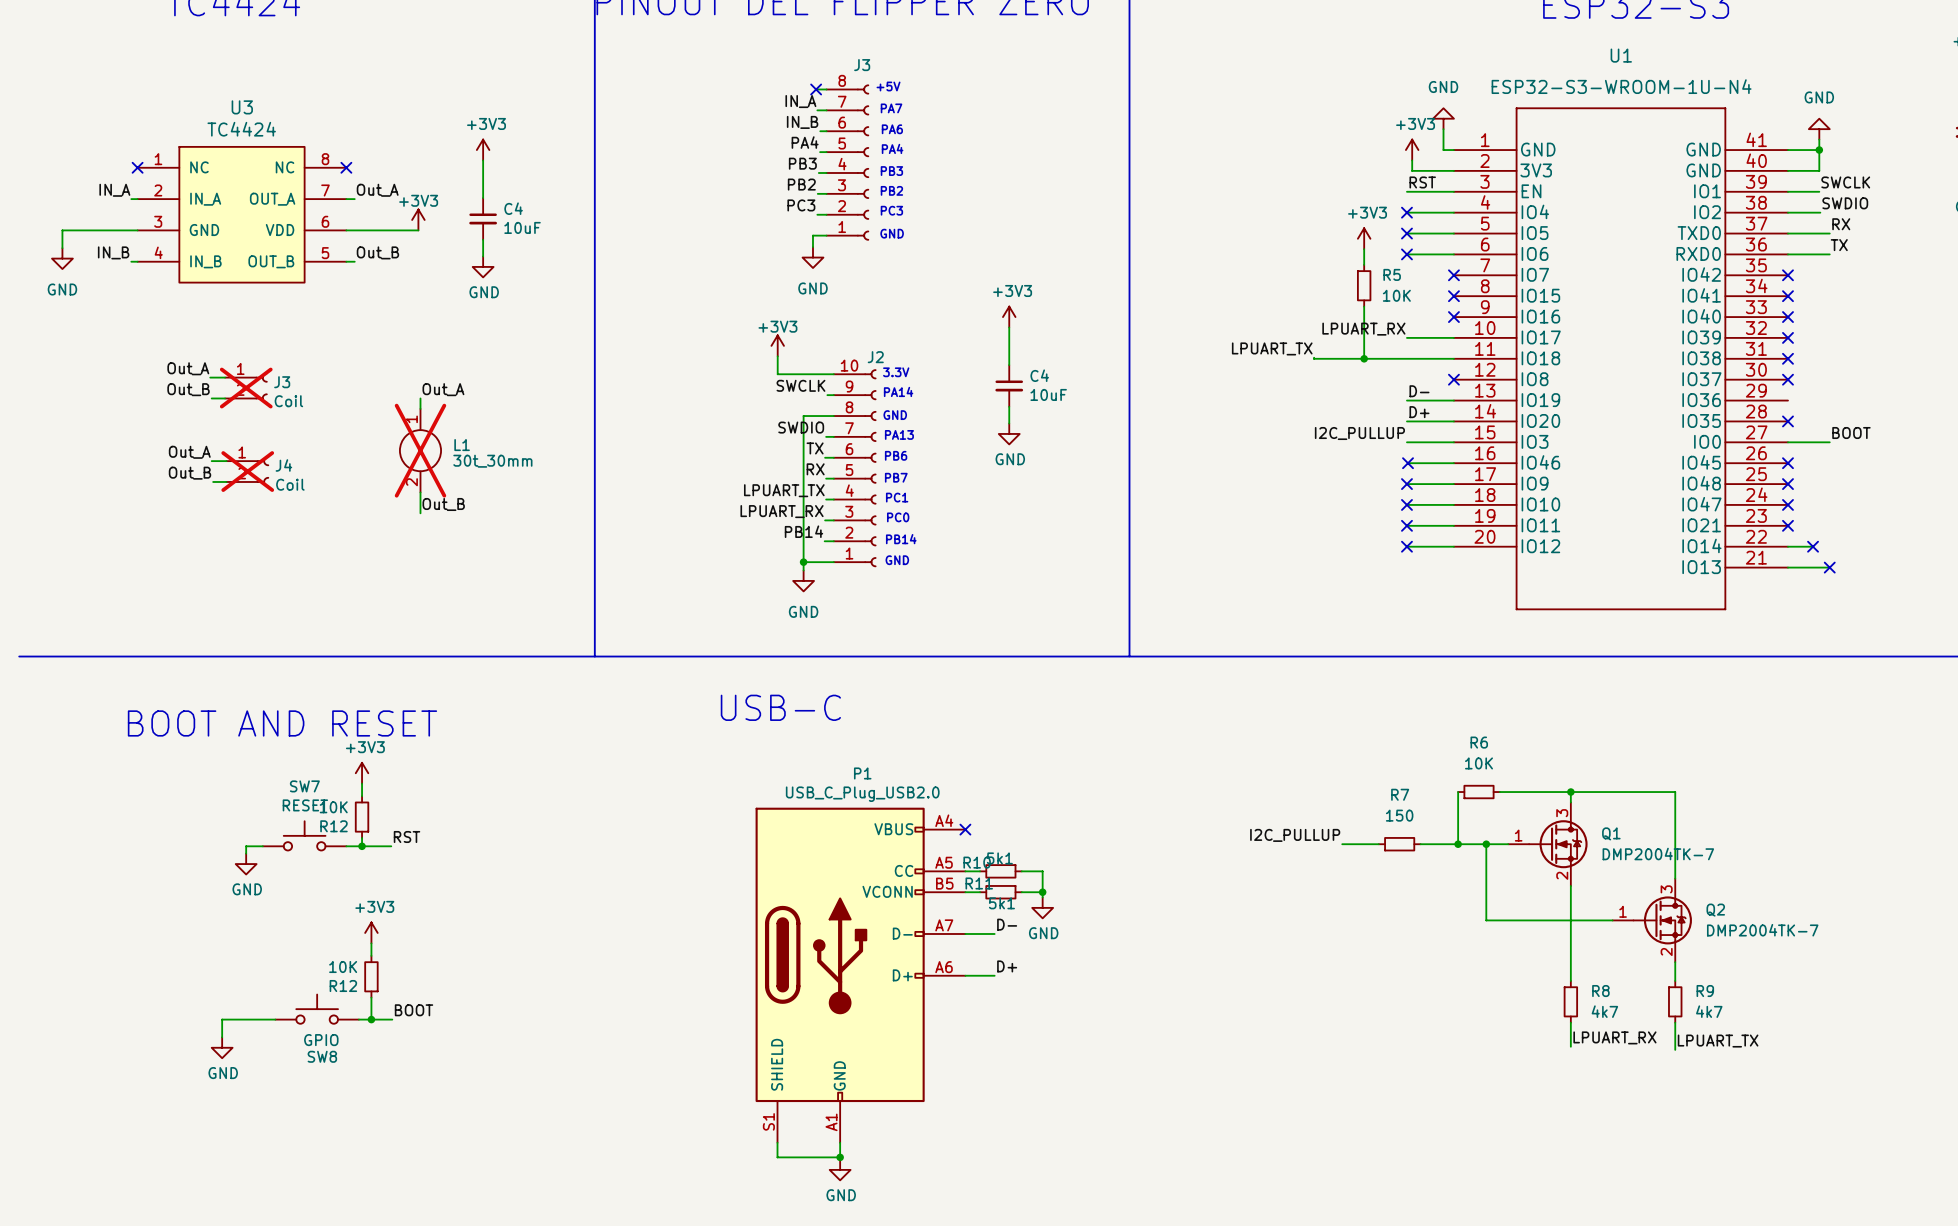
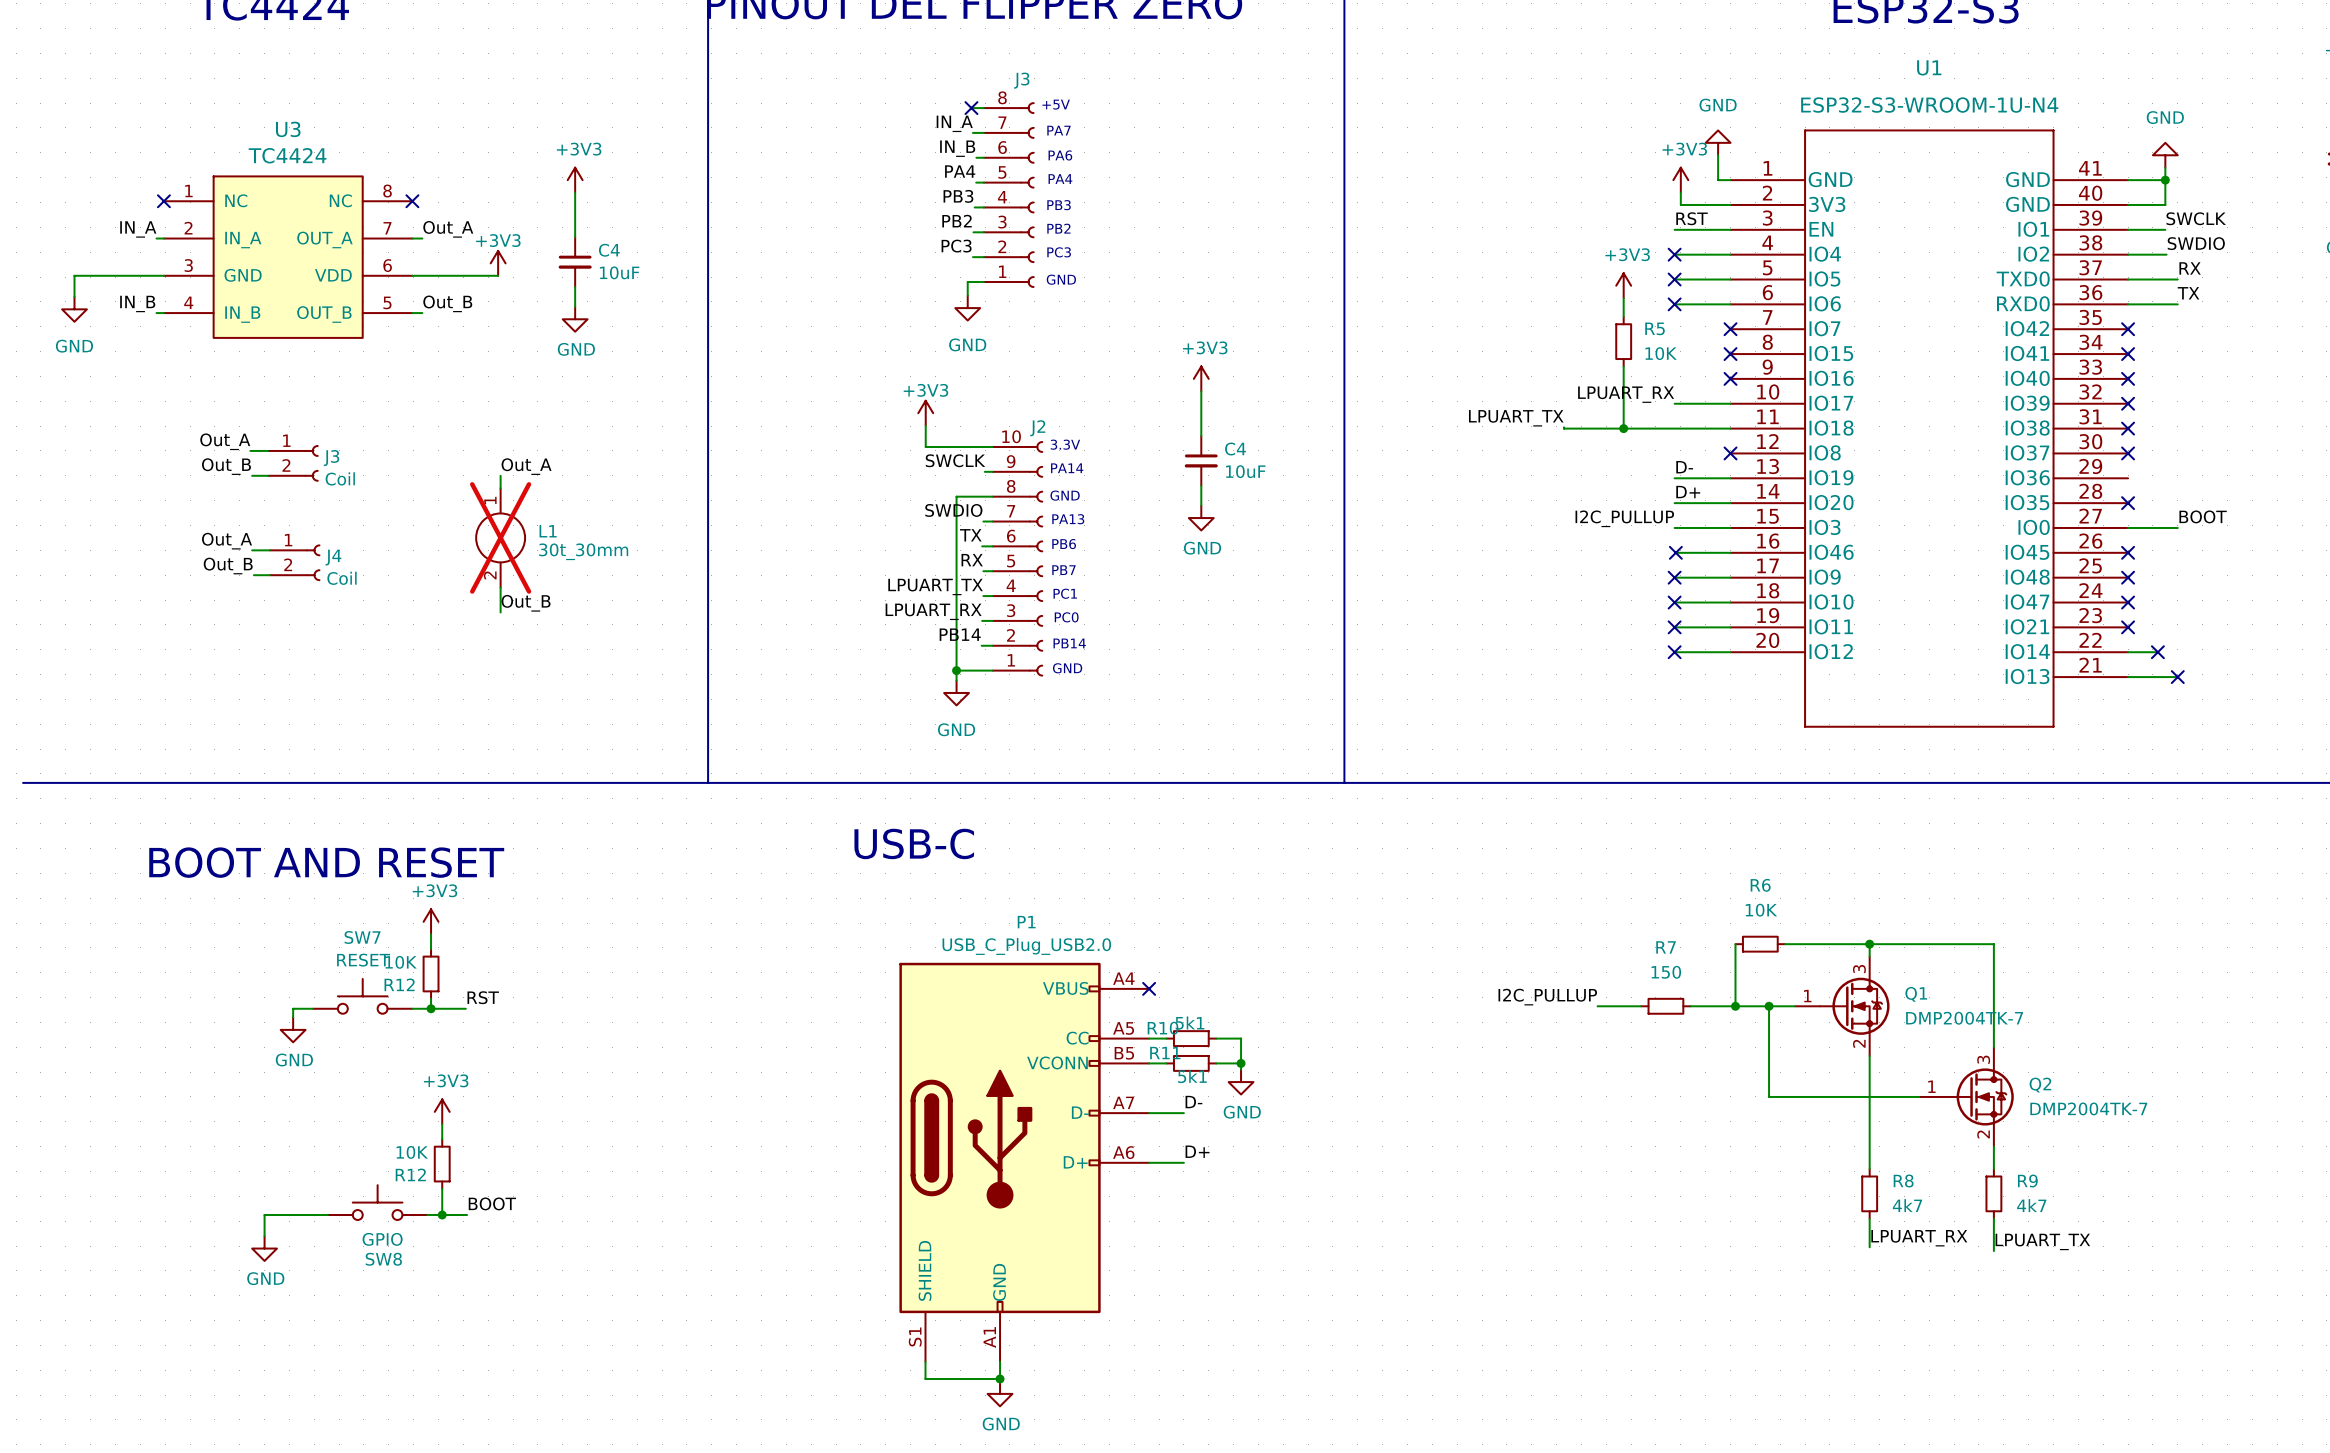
J3 do-not-place cross: (246, 388) -> none
J4 do-not-place cross: (247, 471) -> none

